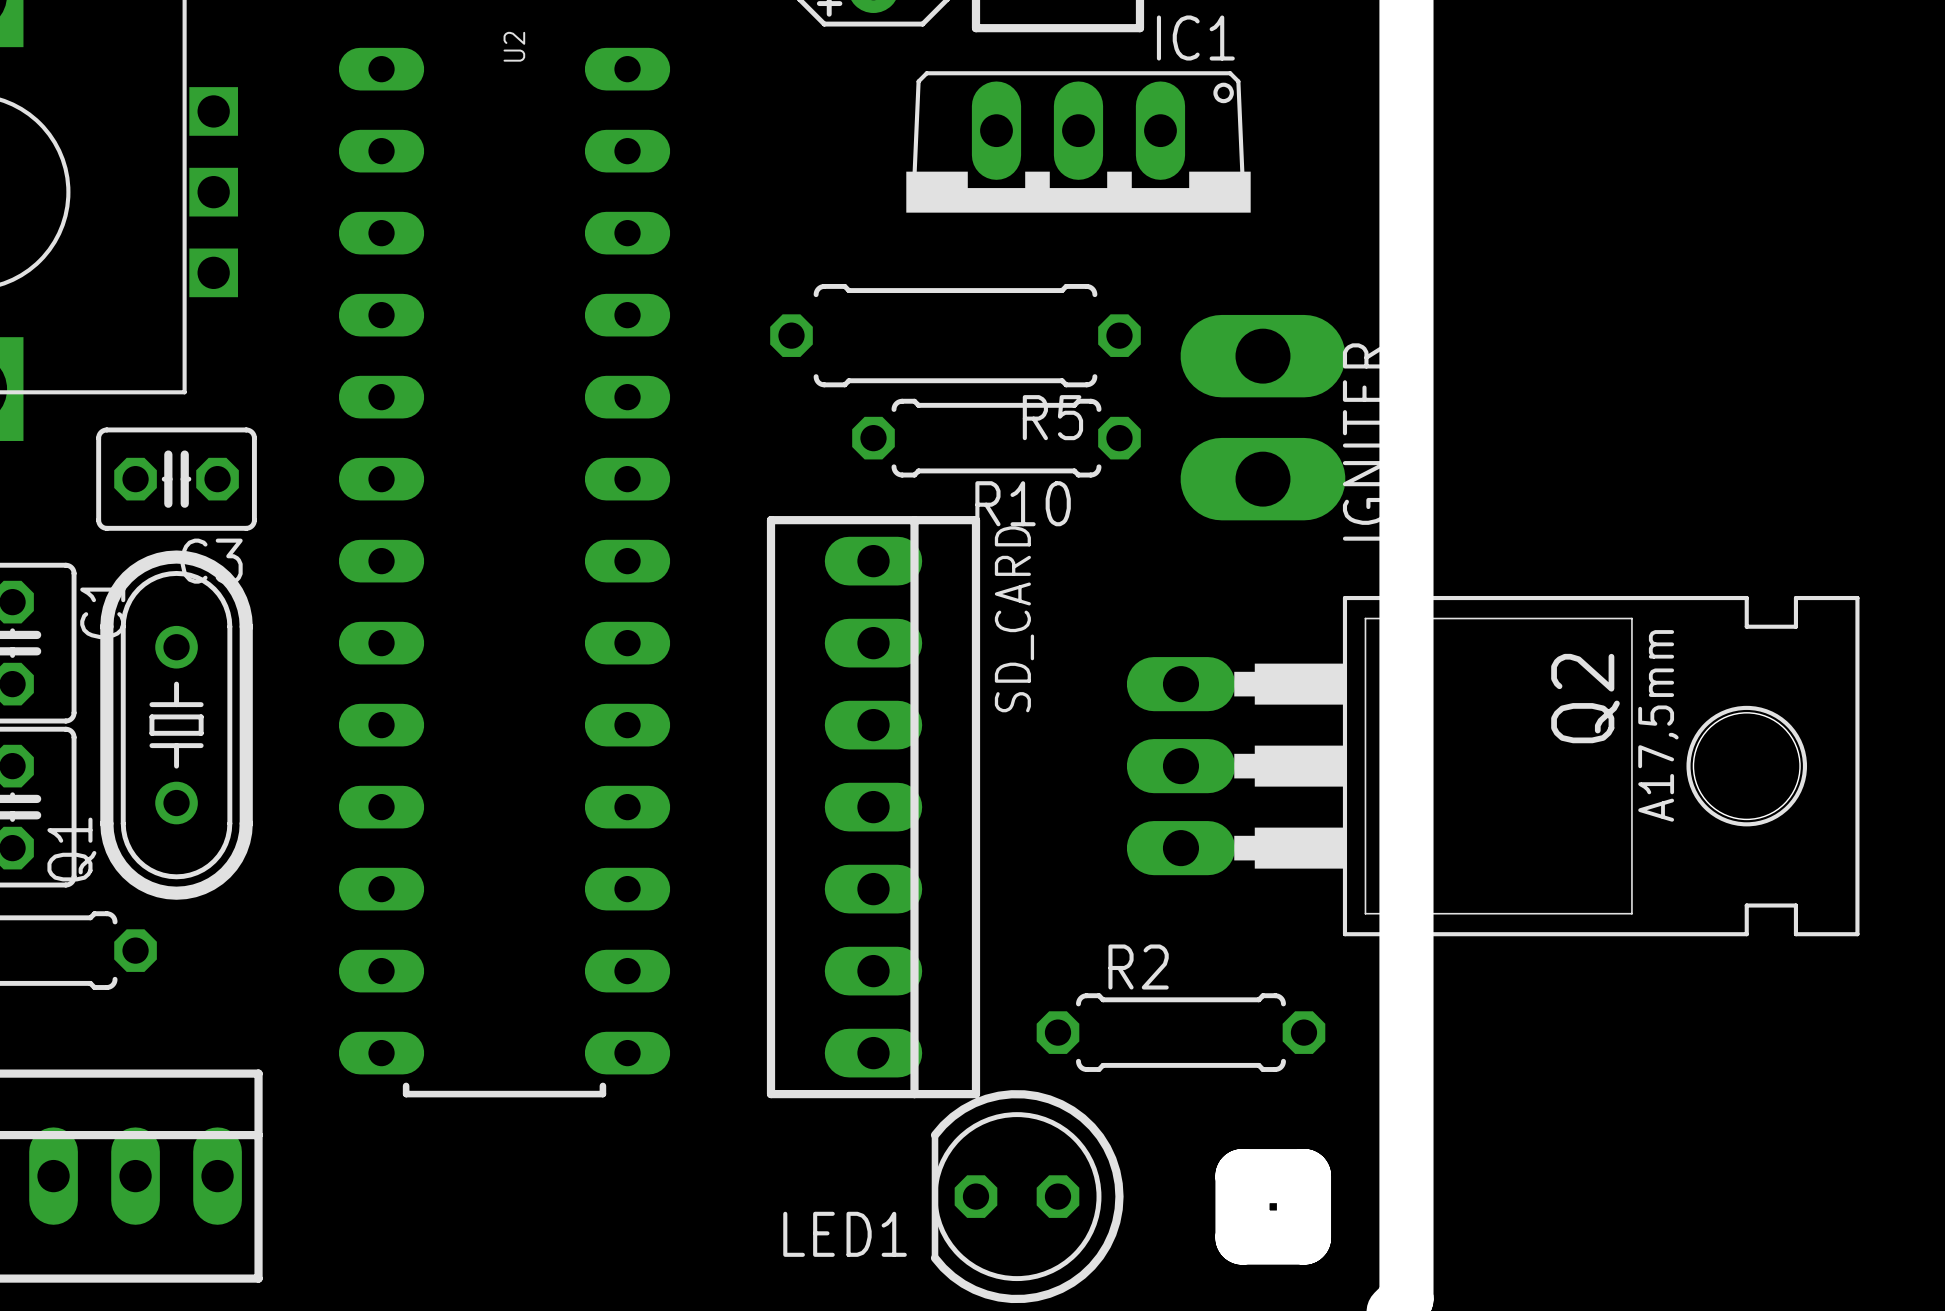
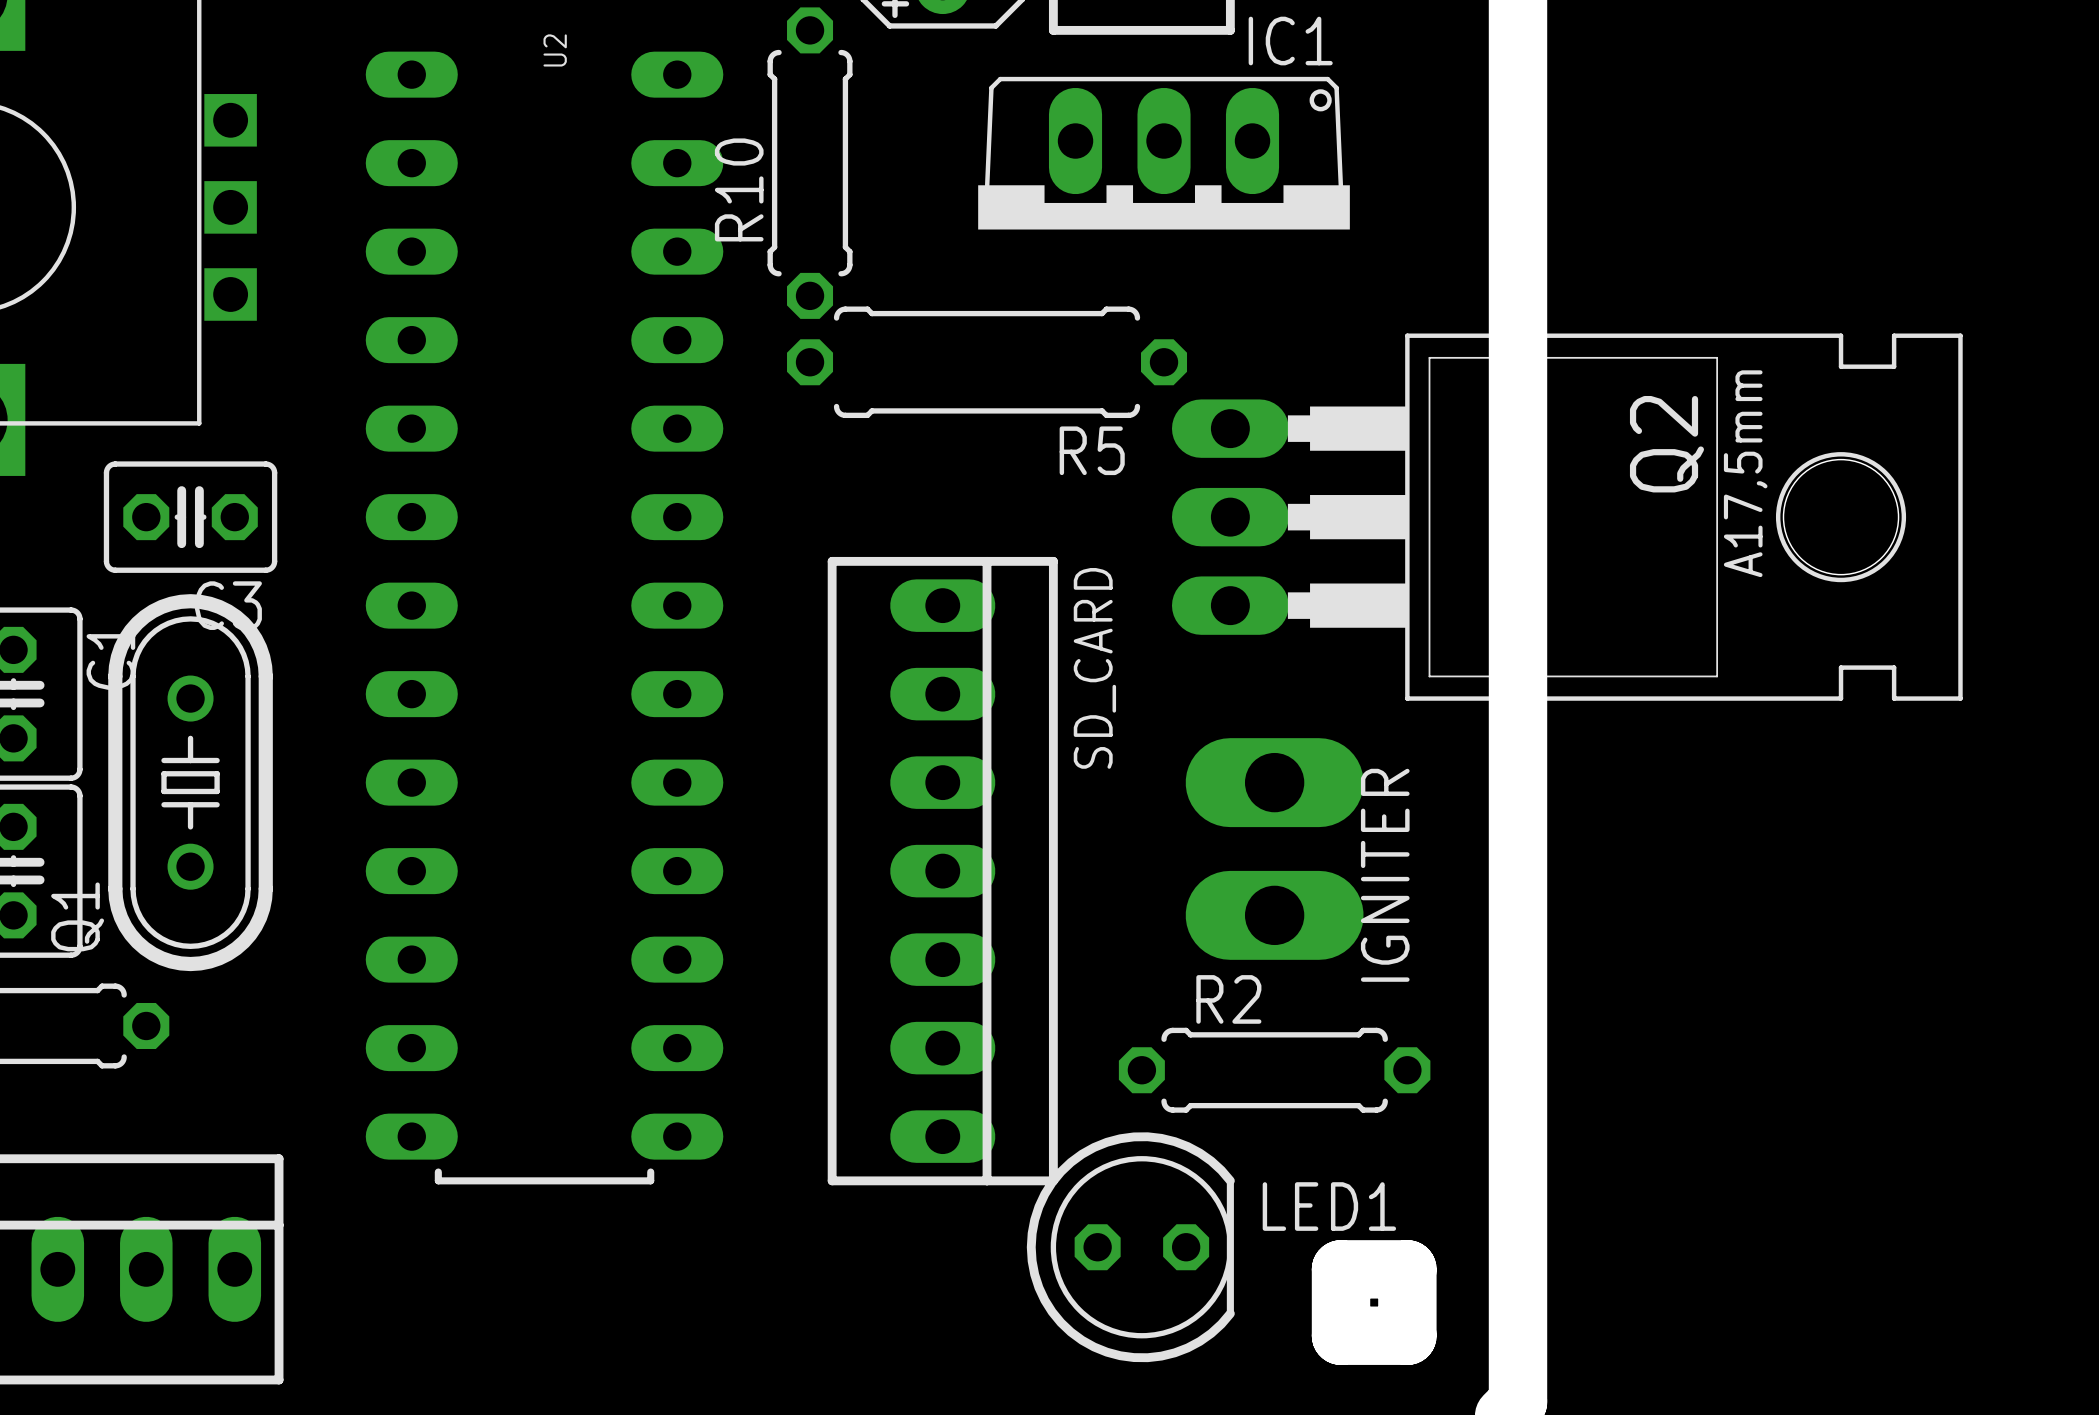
R5 position: (955, 335) -> (987, 362)
IGNITER position: (1262, 417) -> (1274, 848)
R10 rotation: 0° (996, 438) -> 90° clockwise (810, 163)
R10 position: (996, 438) -> (810, 163)
Q2 position: (1493, 766) -> (1567, 517)
R2 position: (1180, 1032) -> (1274, 1070)
LED1 rotation: 0° (1027, 1196) -> 180° (1130, 1247)

